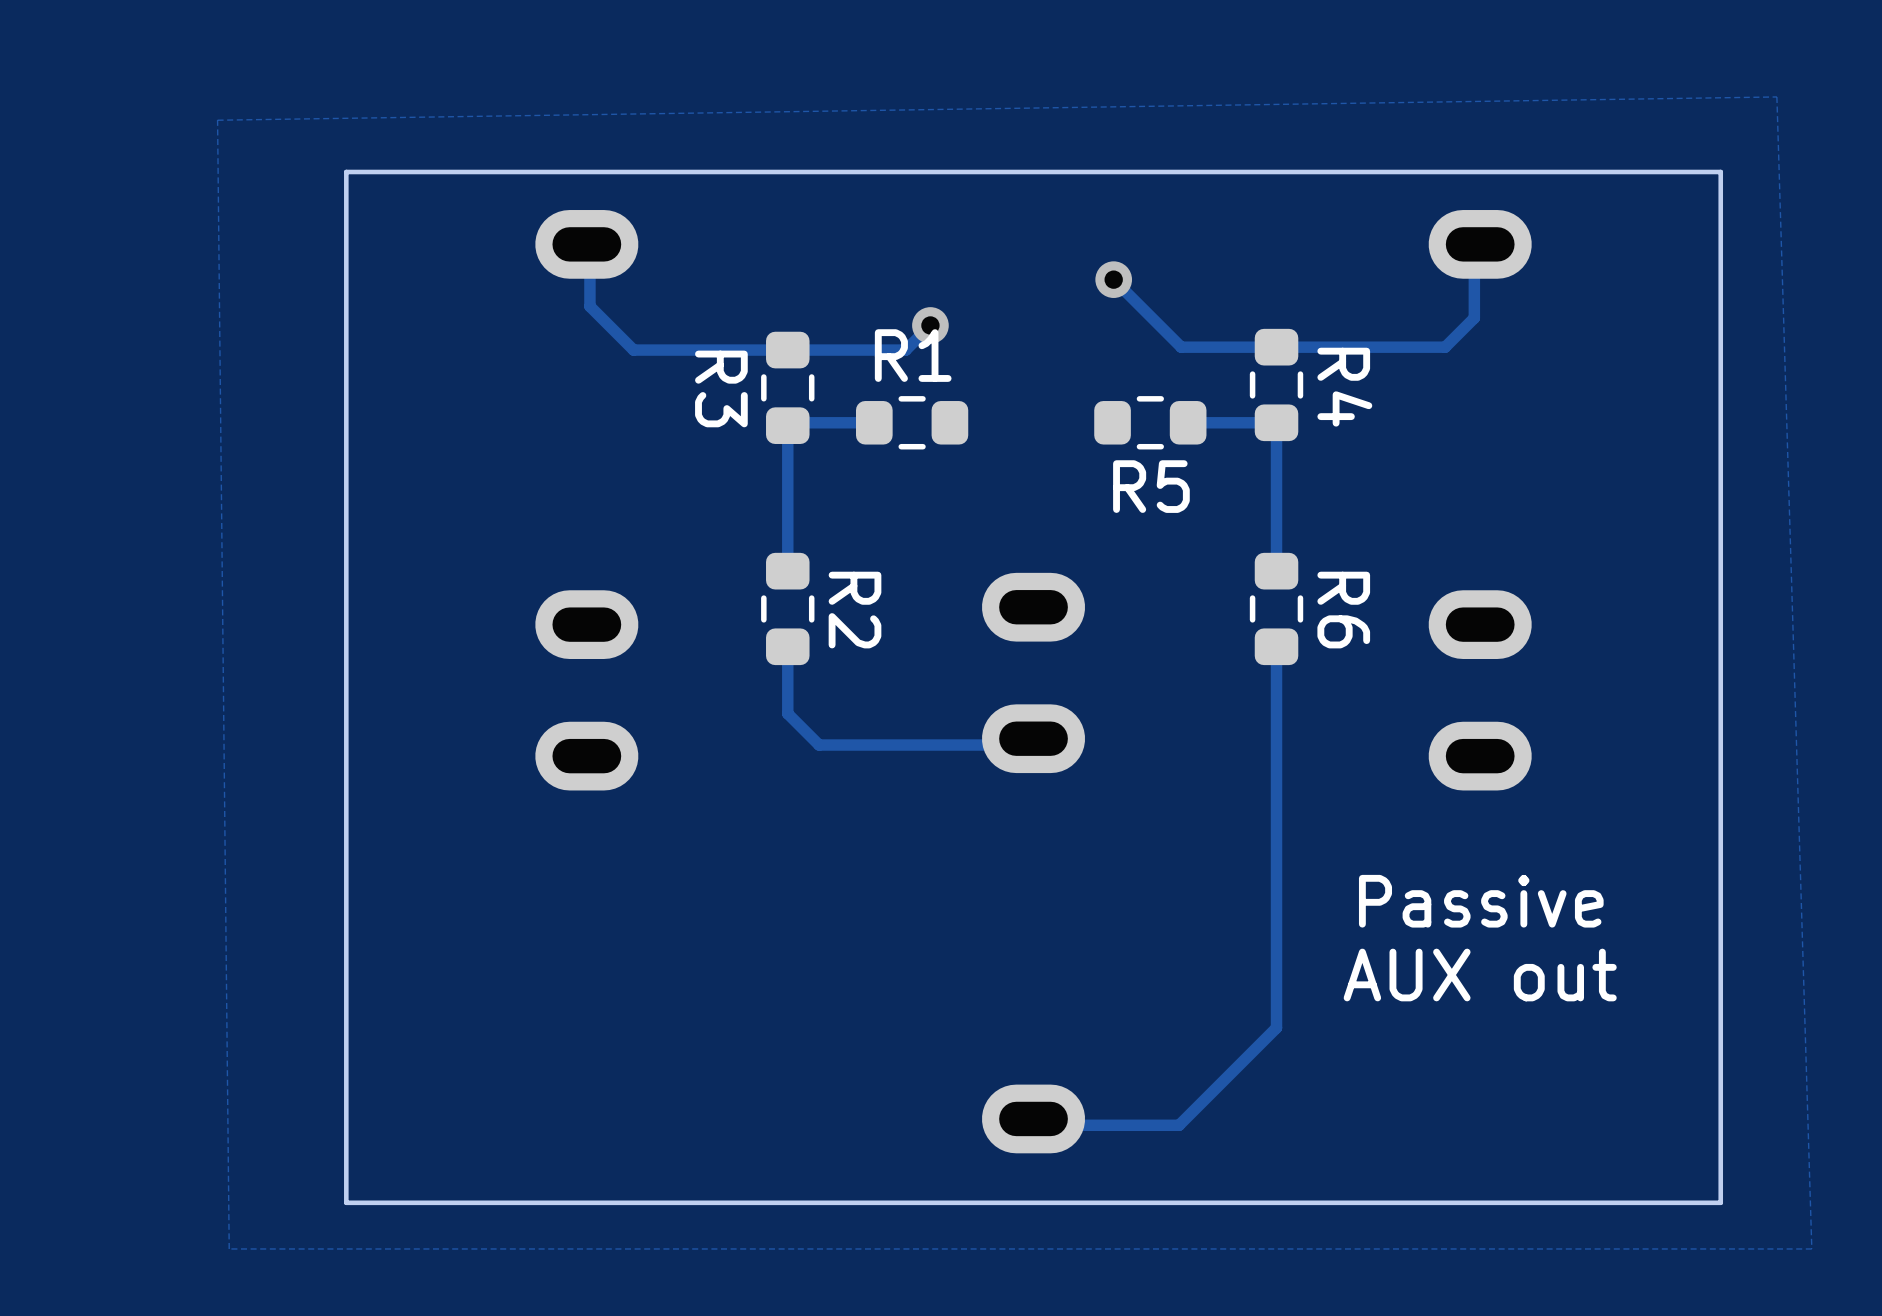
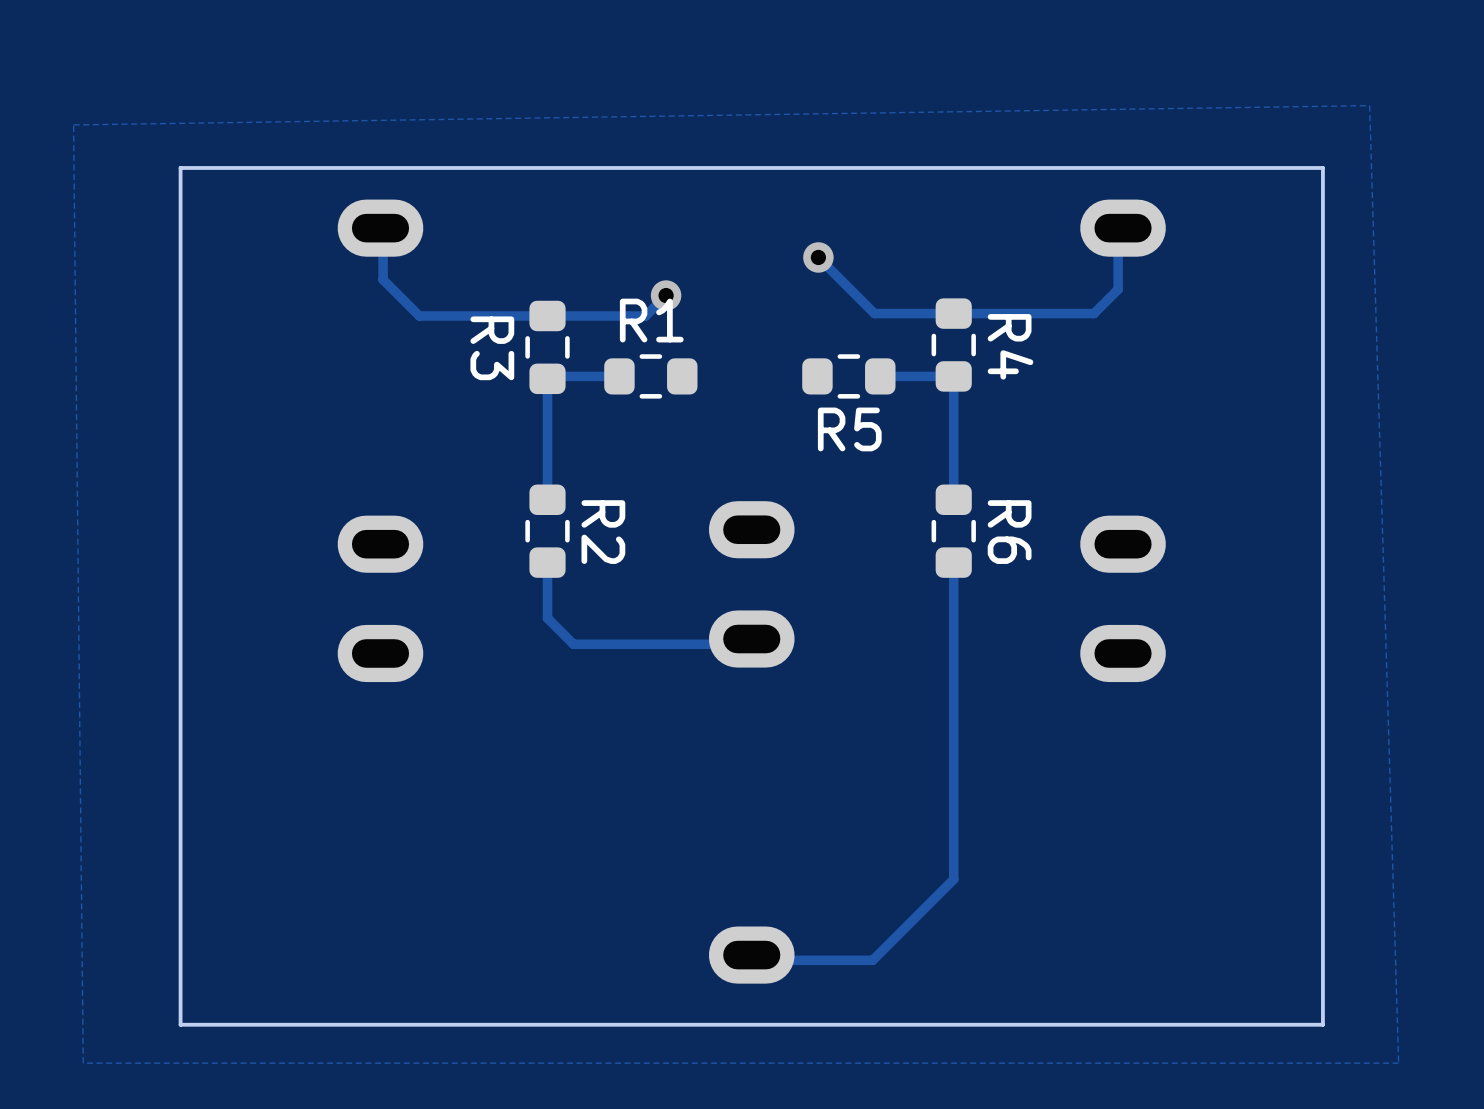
text: Passive (1481, 901) -> none
text: AUX out (1480, 975) -> none

